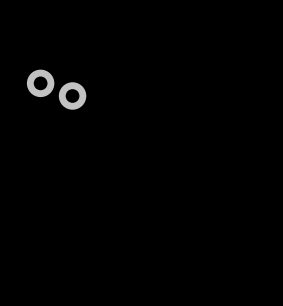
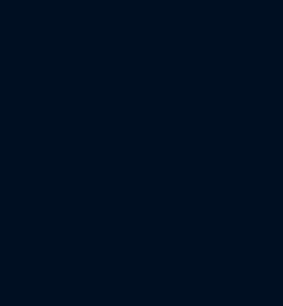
via: (40, 83) -> none
via: (72, 95) -> none

